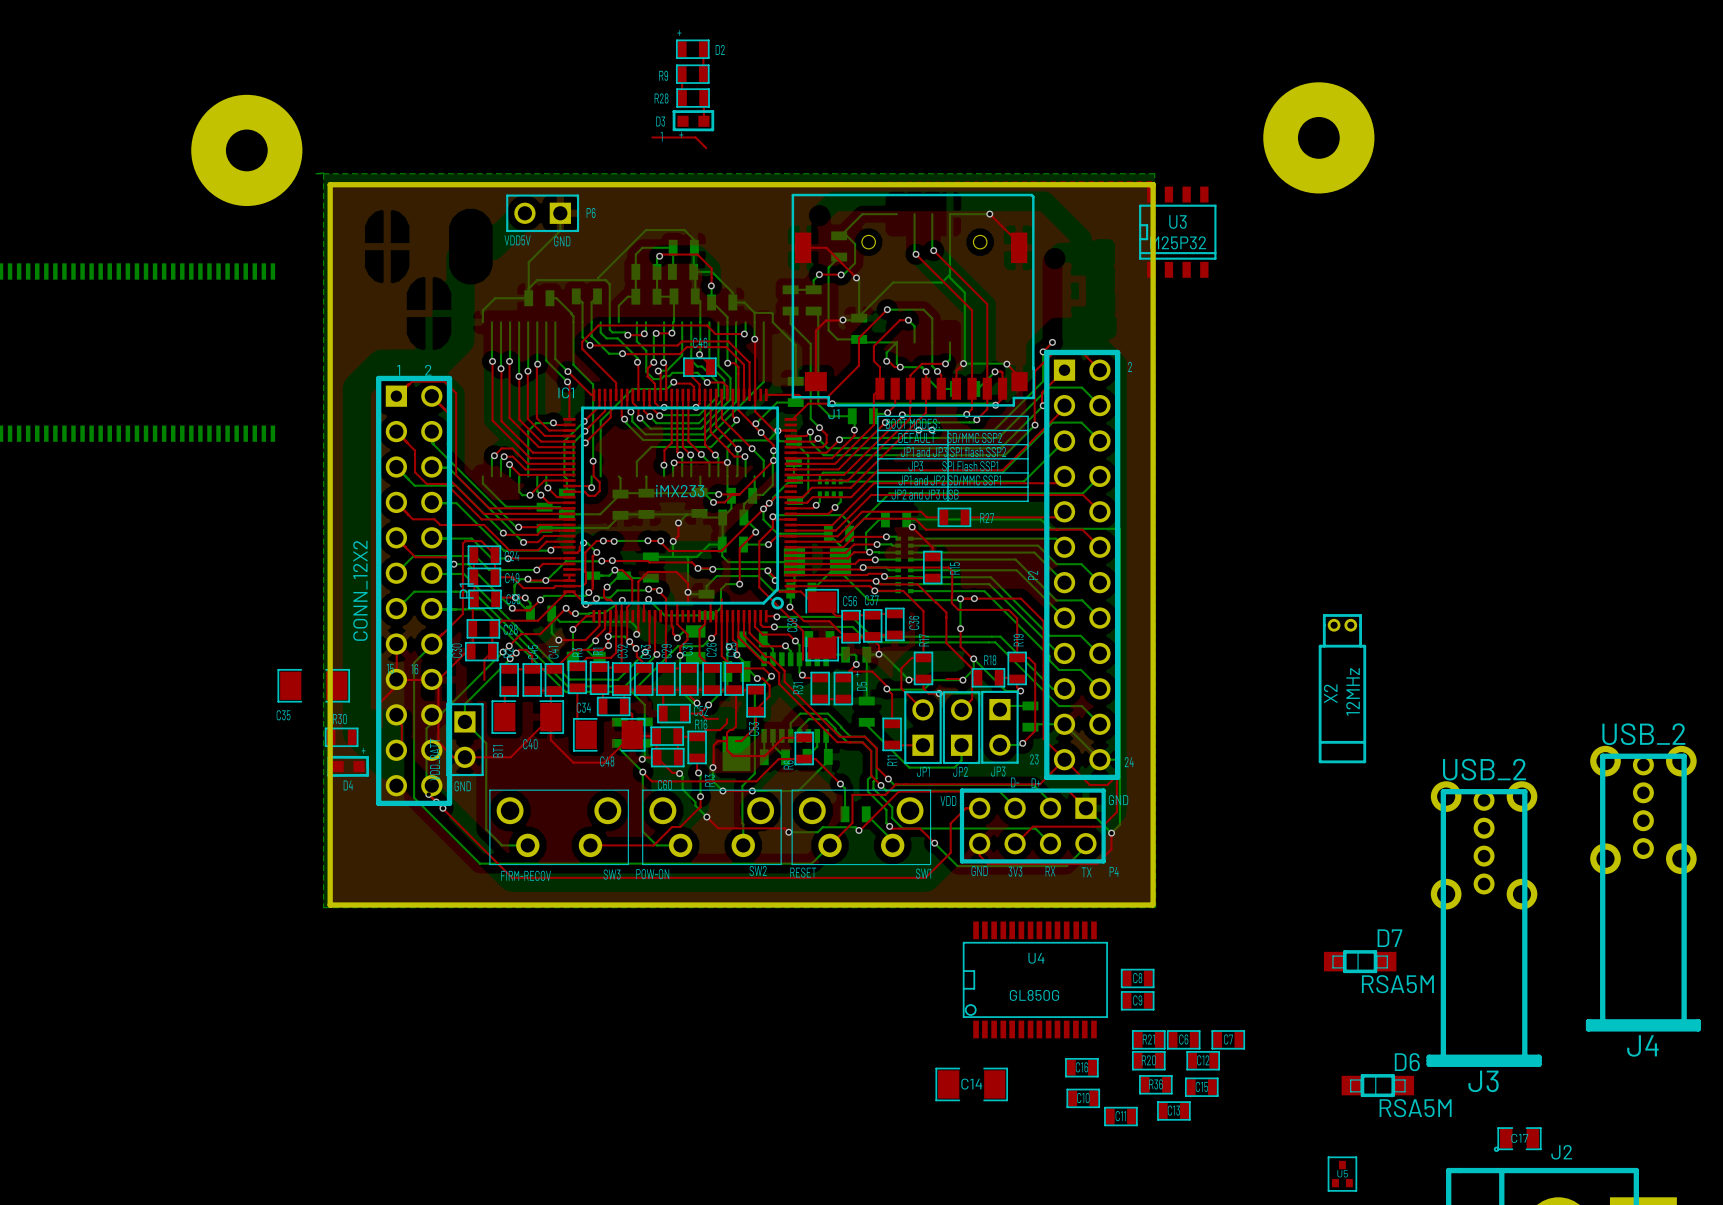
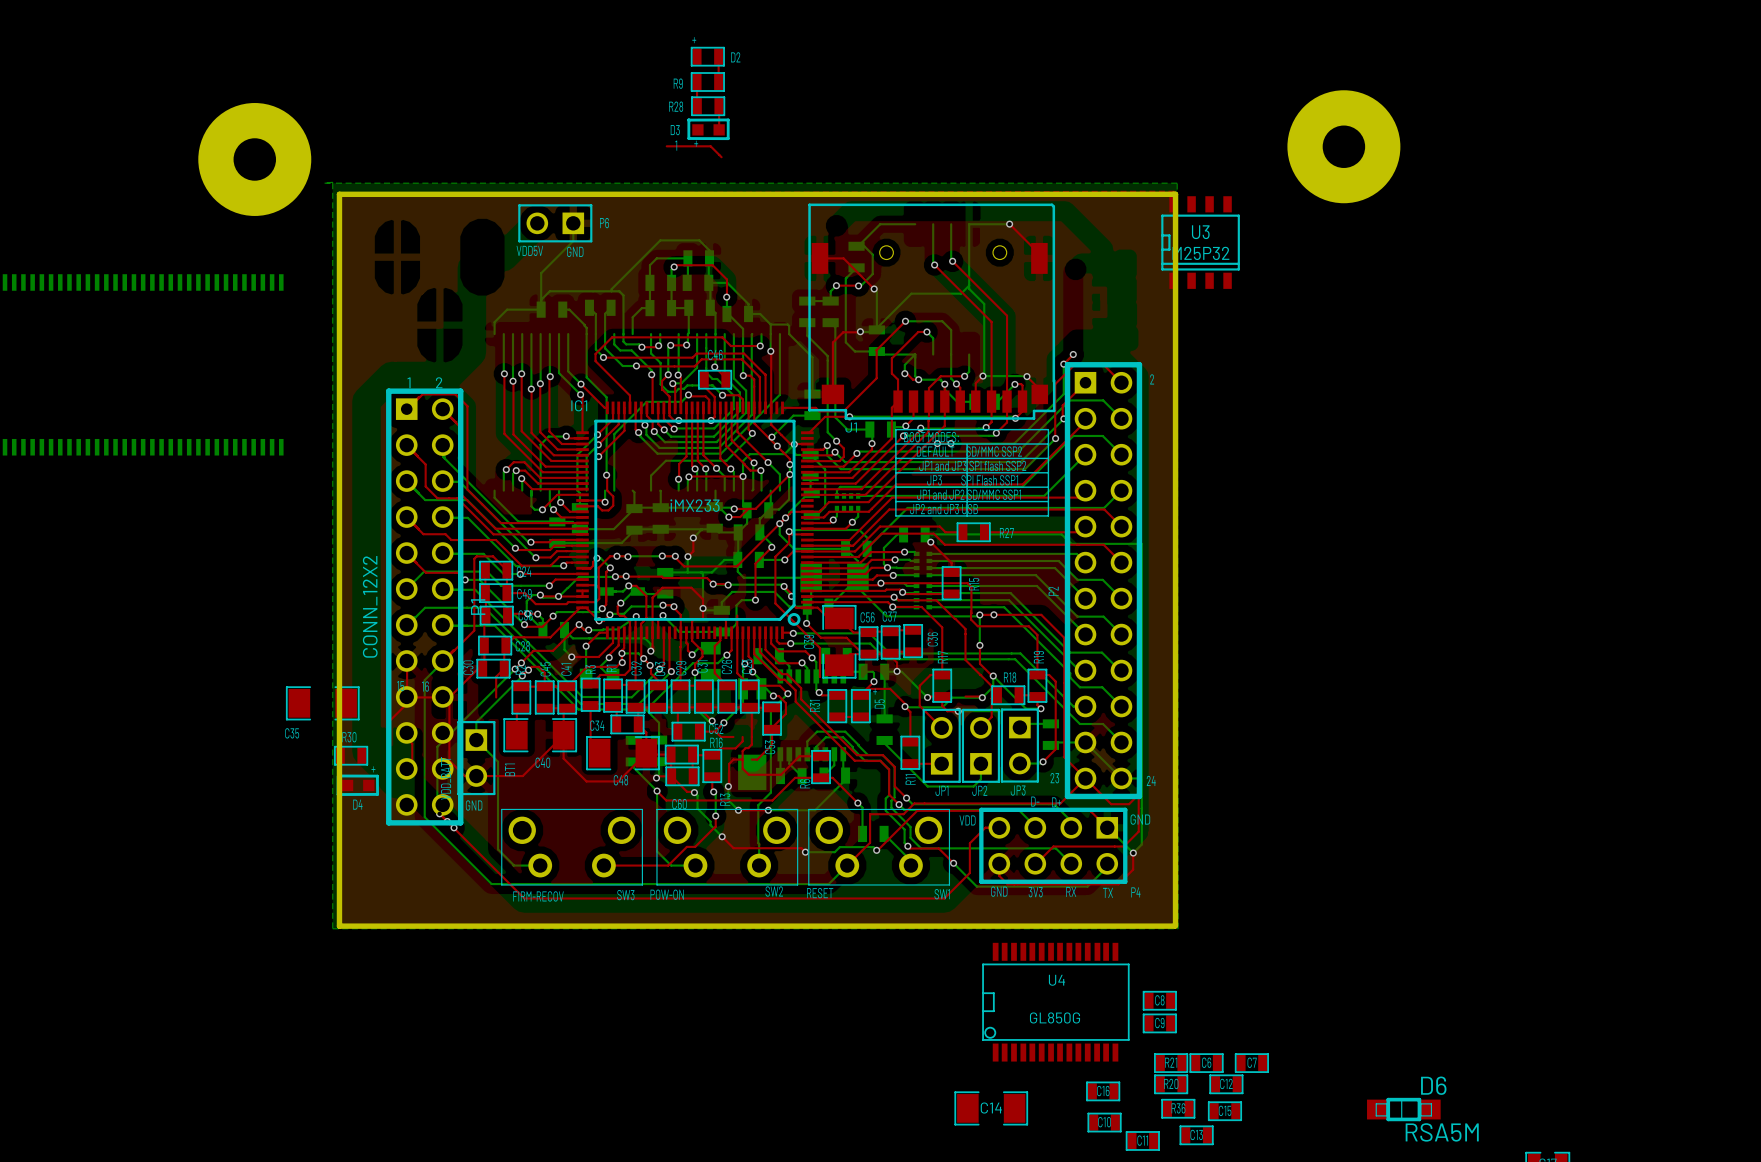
X2: 12MHz (1342, 688) -> none
J4: USB_2 (1643, 888) -> none
J3: USB_2 (1484, 924) -> none
D7: RSA5M (1360, 961) -> none

